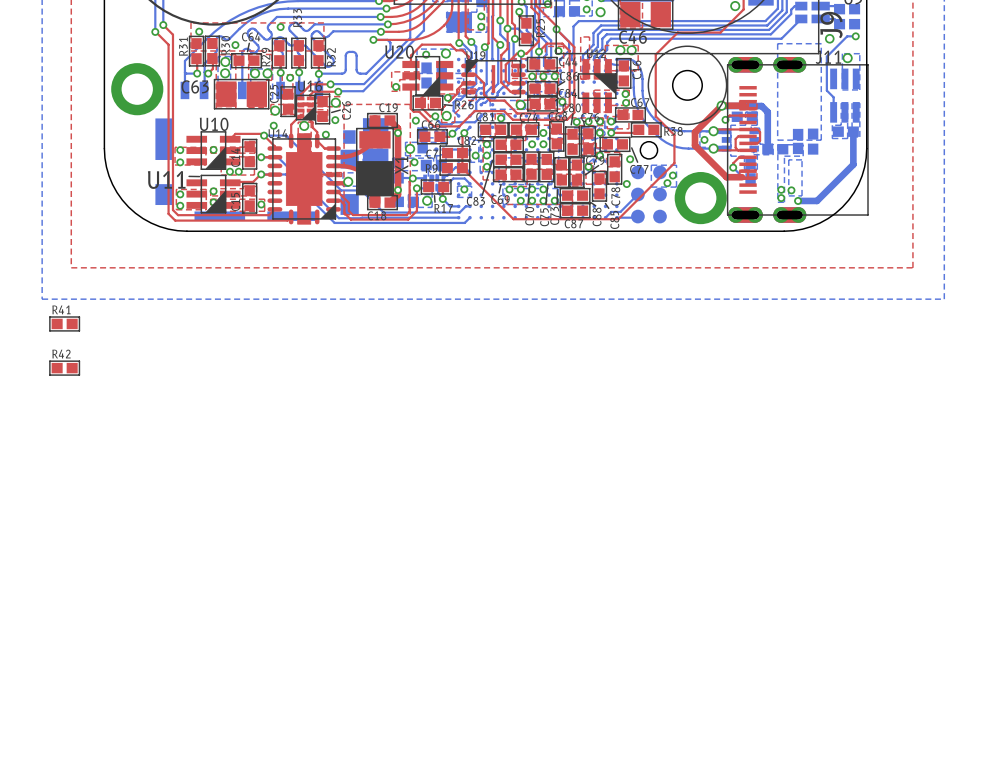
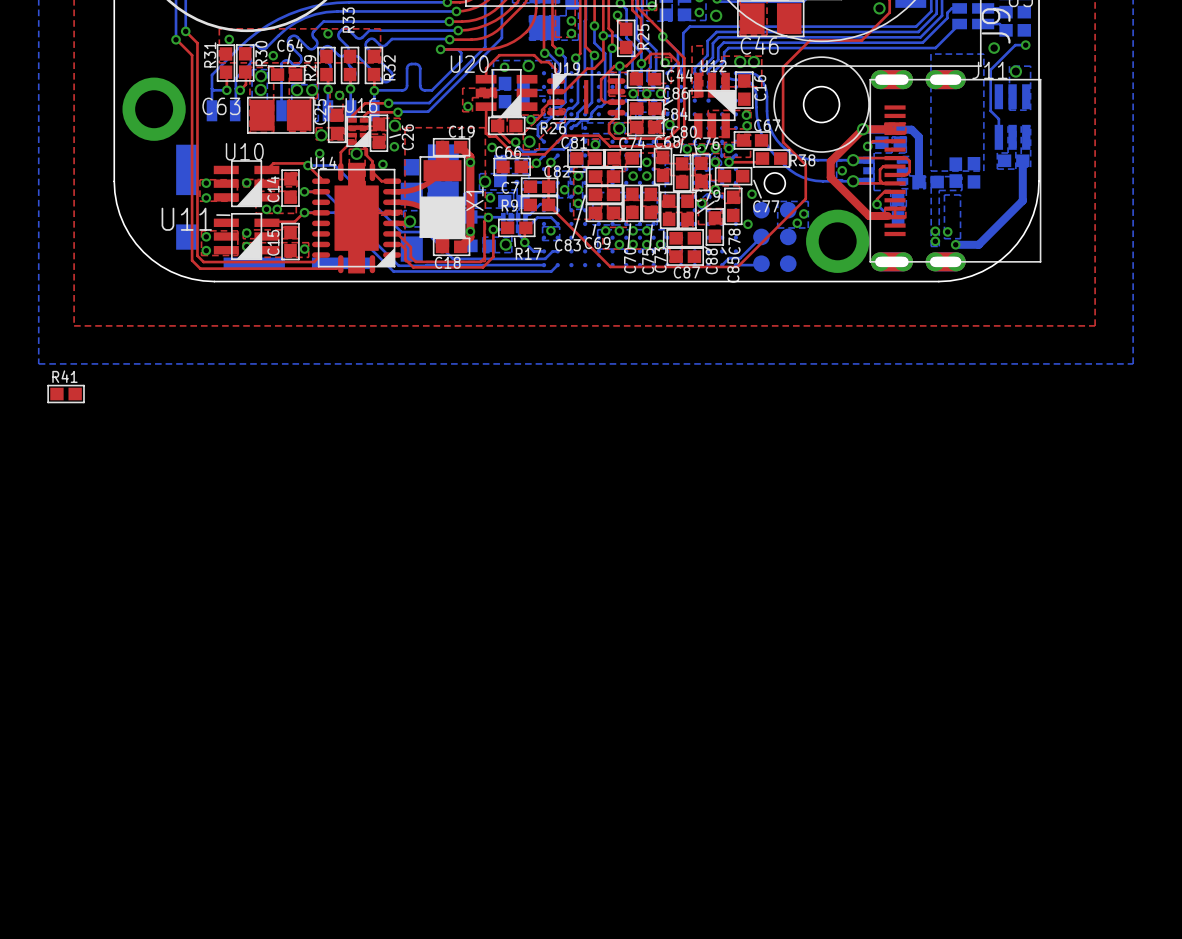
top track: (507, 48) (501, 55) (501, 82) (510, 91) (518, 91) -> (603, 59) (594, 68) (587, 68) (564, 91)
top track: (475, 74) (483, 83) (483, 94) (490, 100) (504, 100) (512, 108) -> (616, 112) (616, 116) (609, 124) (609, 132)
R42: (64, 368) -> none

